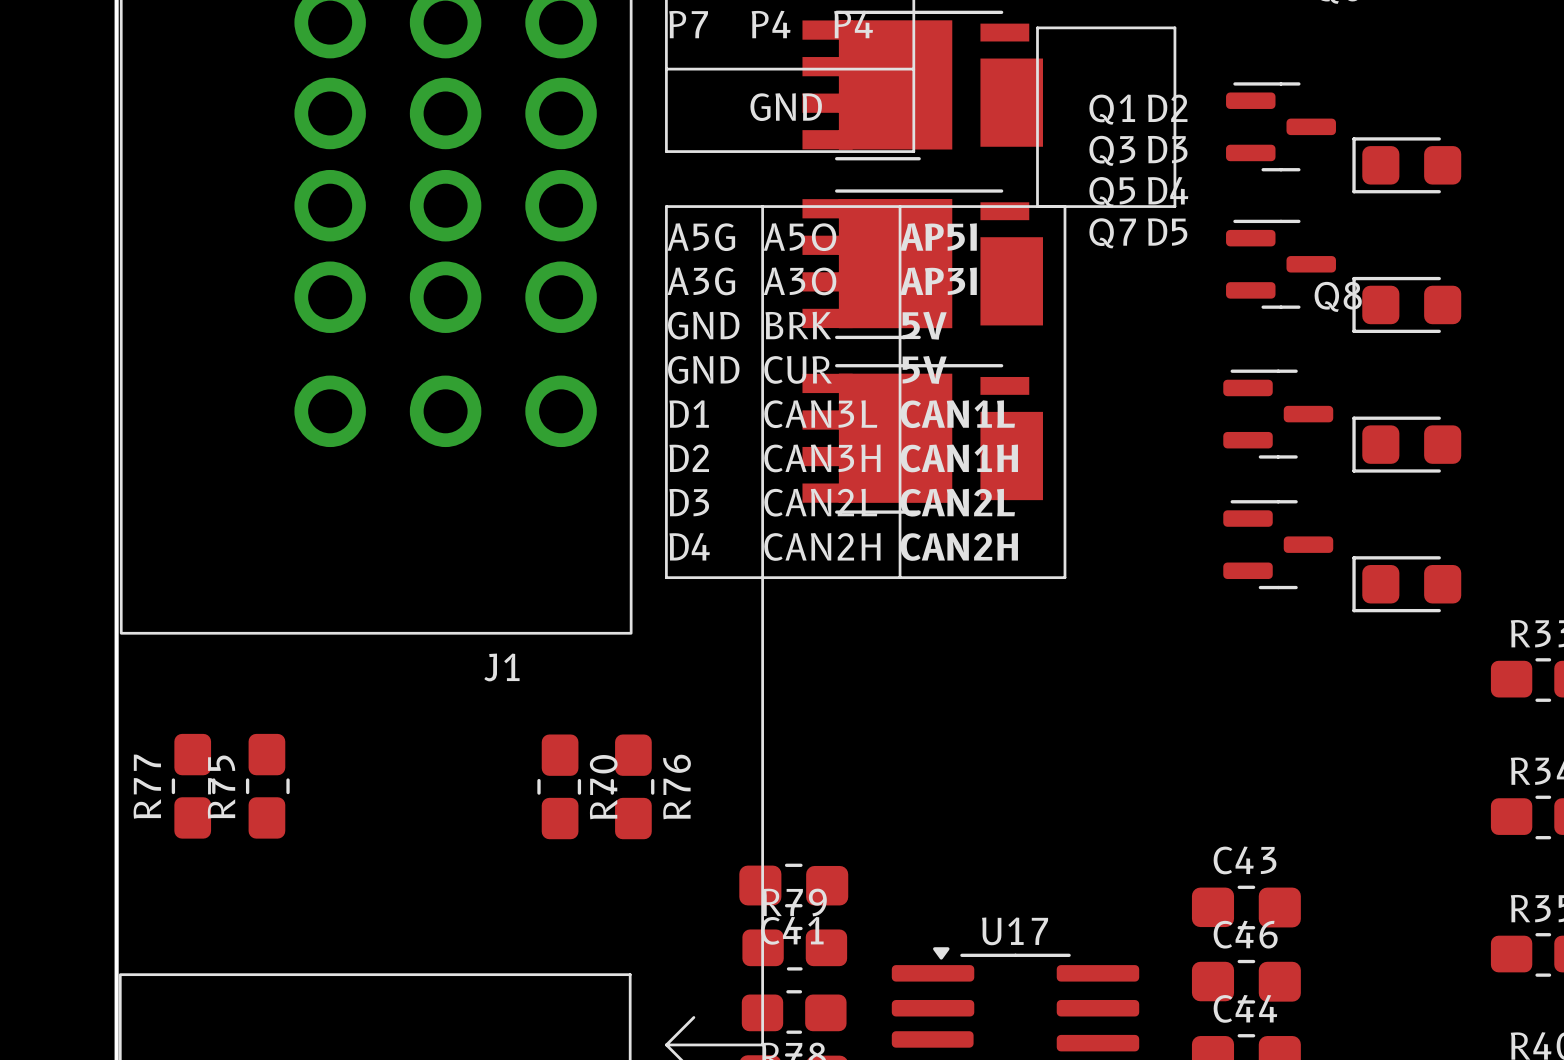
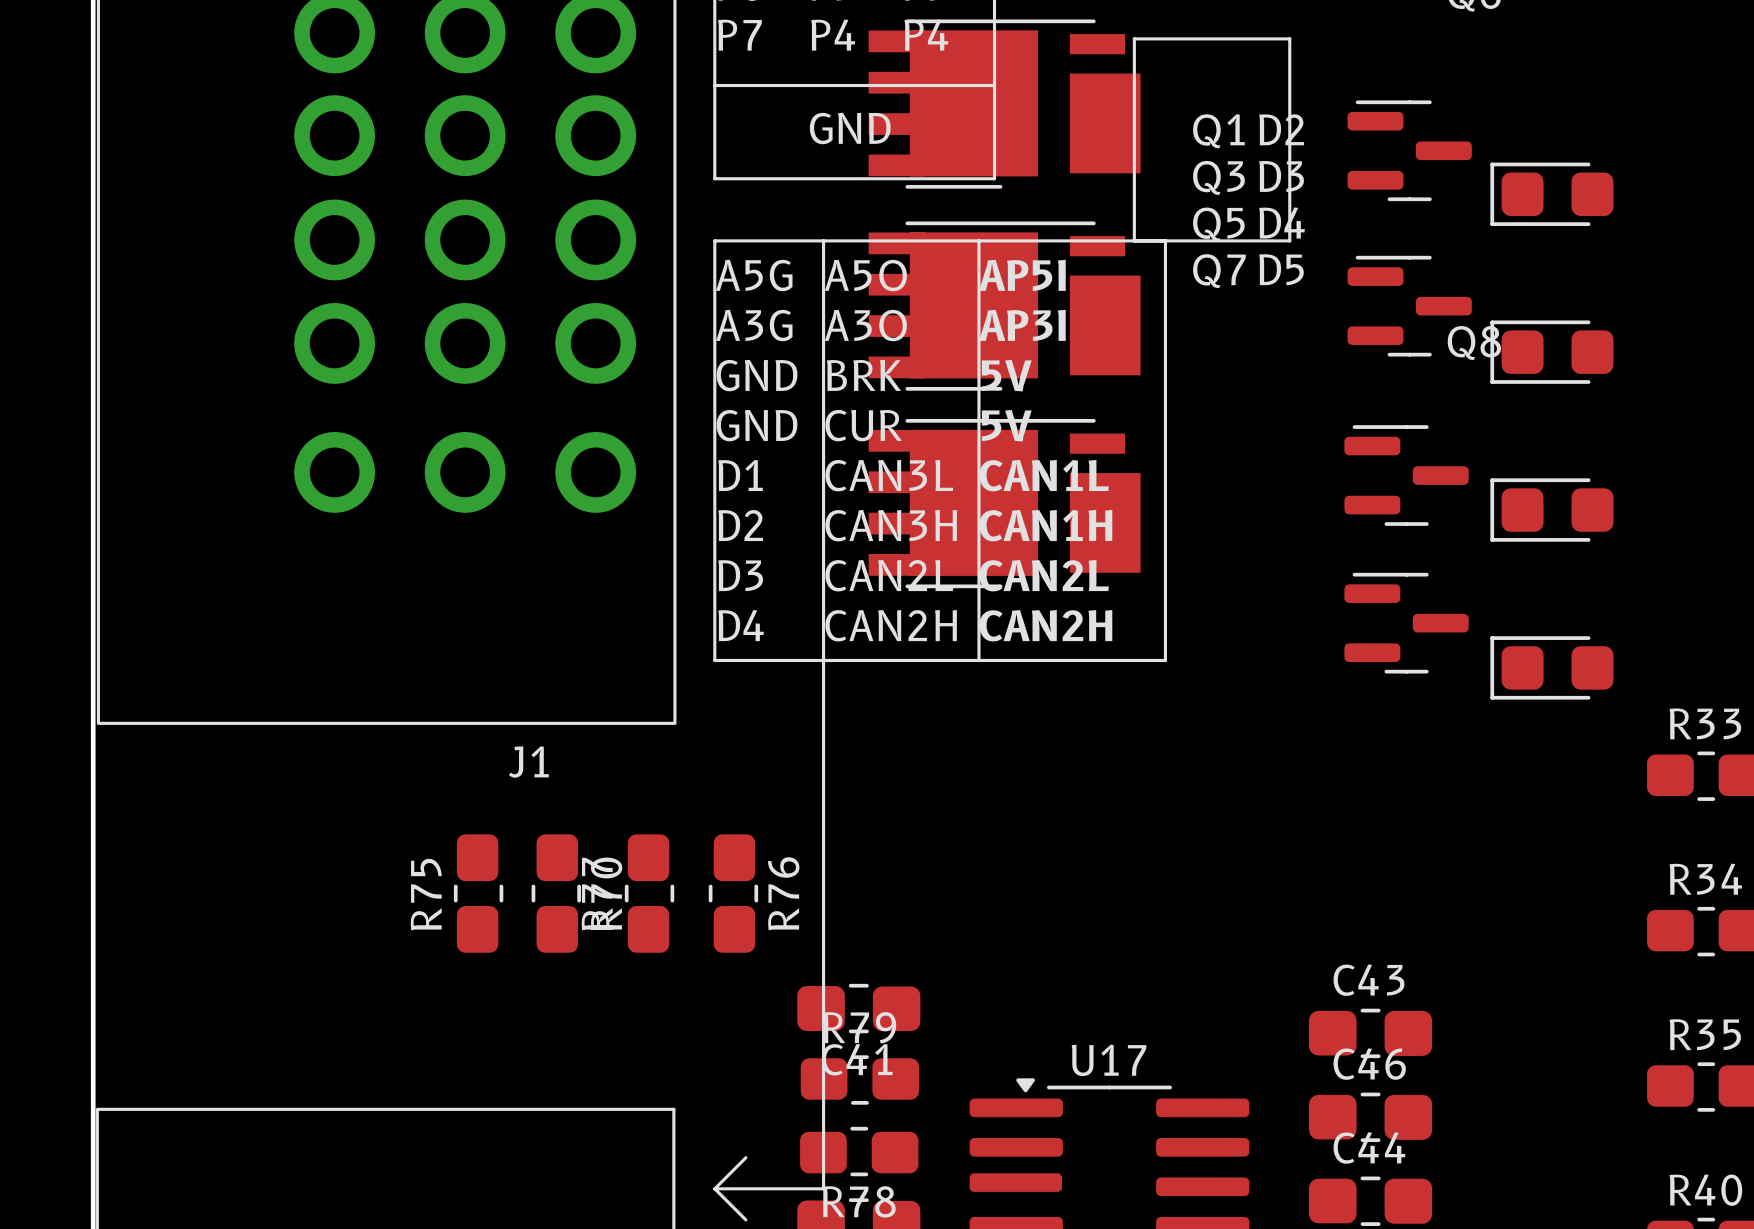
R77 position: (193, 786) -> (649, 893)
R75 position: (267, 786) -> (478, 893)
R70 position: (559, 786) -> (556, 893)
R76 position: (632, 786) -> (733, 893)

